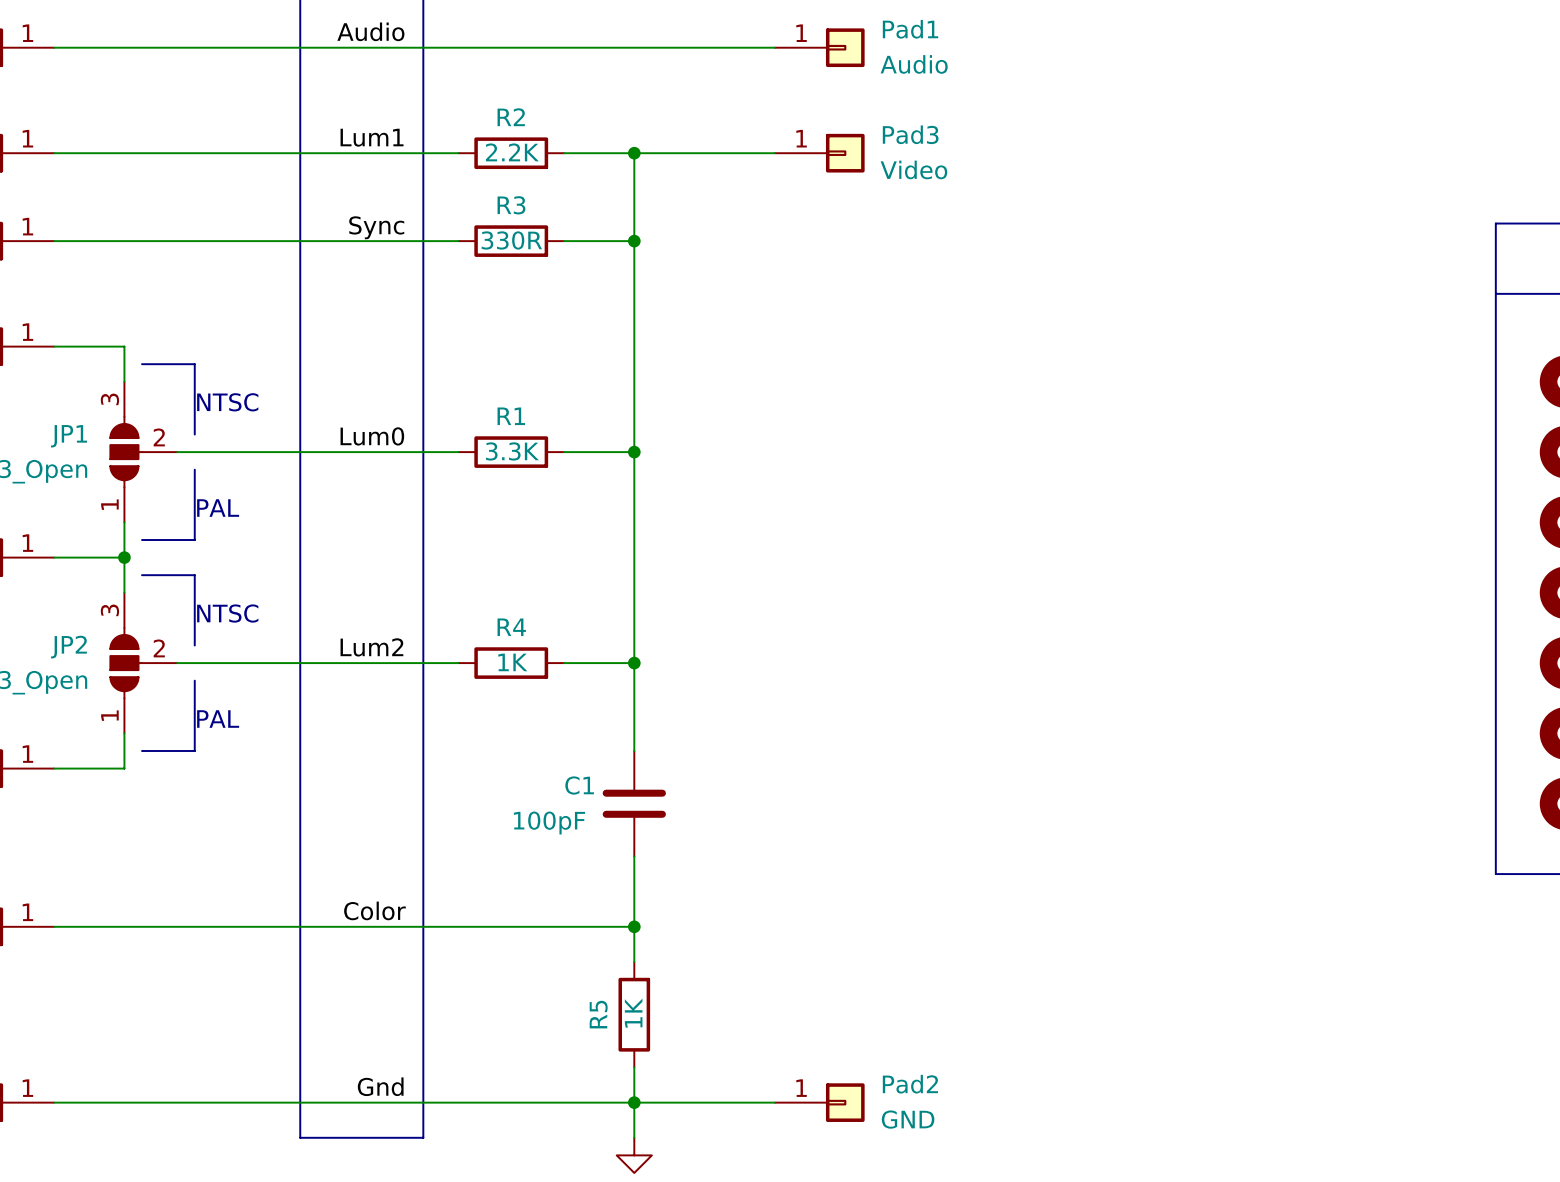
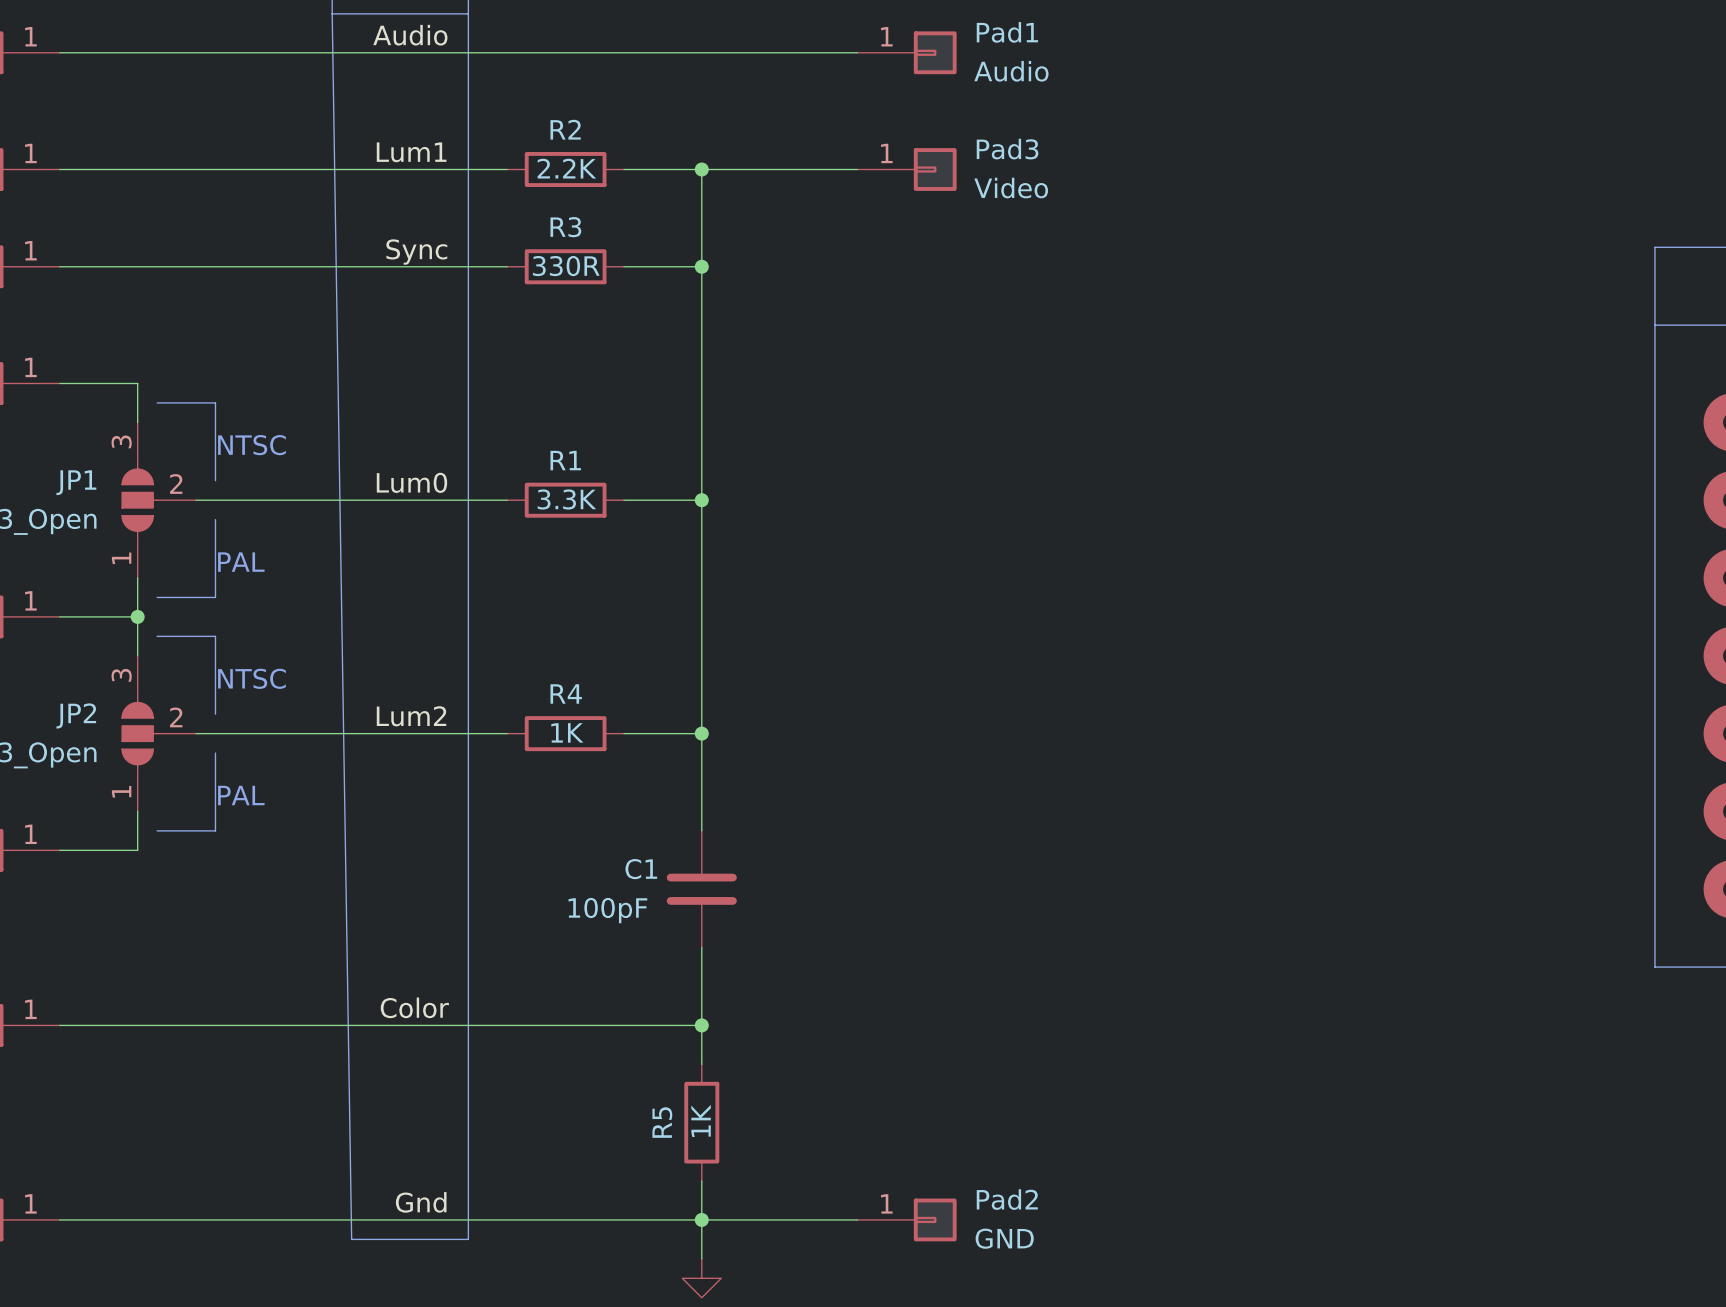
line: (300, 12) (300, 1137) (423, 1137) (423, 1120) -> (468, 13) (332, 13) (351, 1239) (468, 1239)

